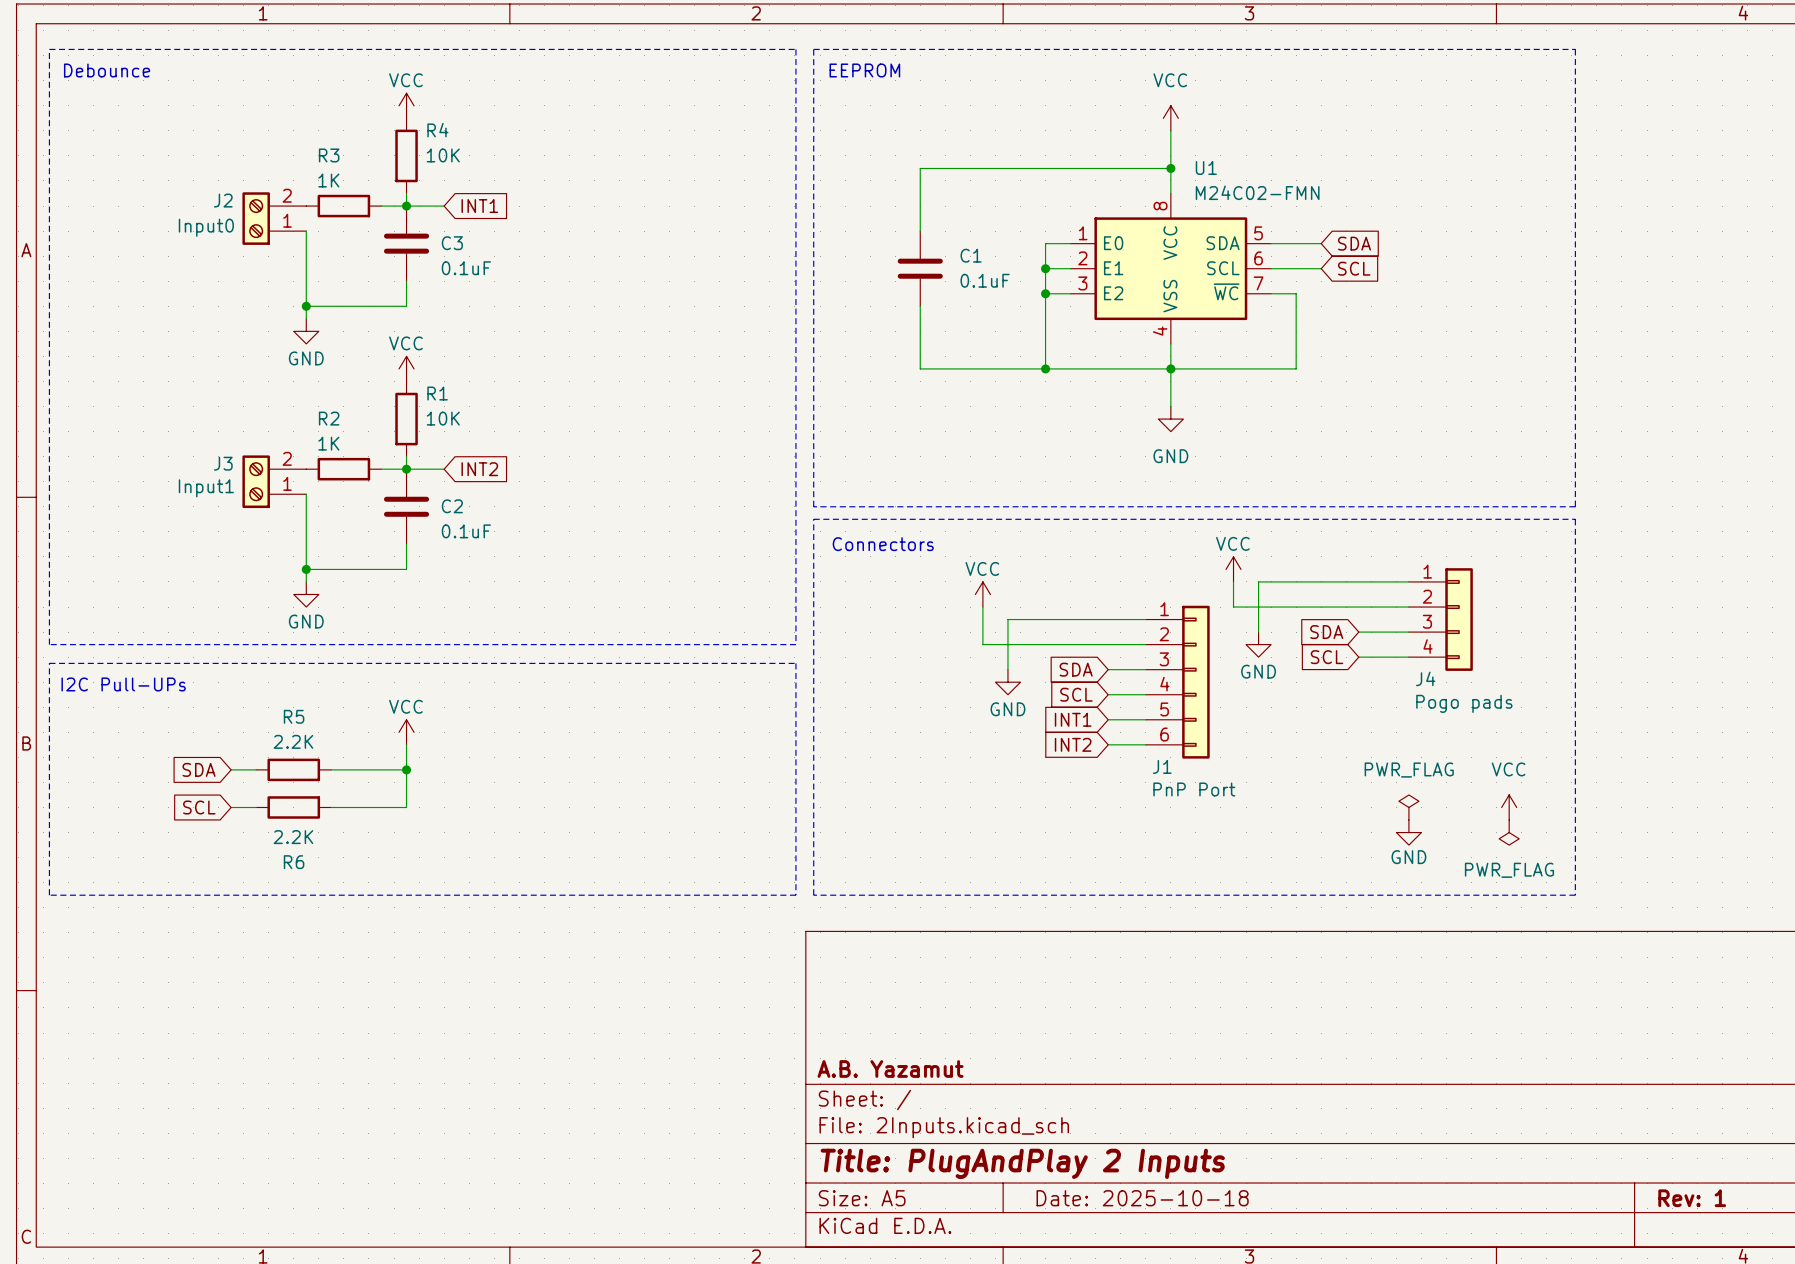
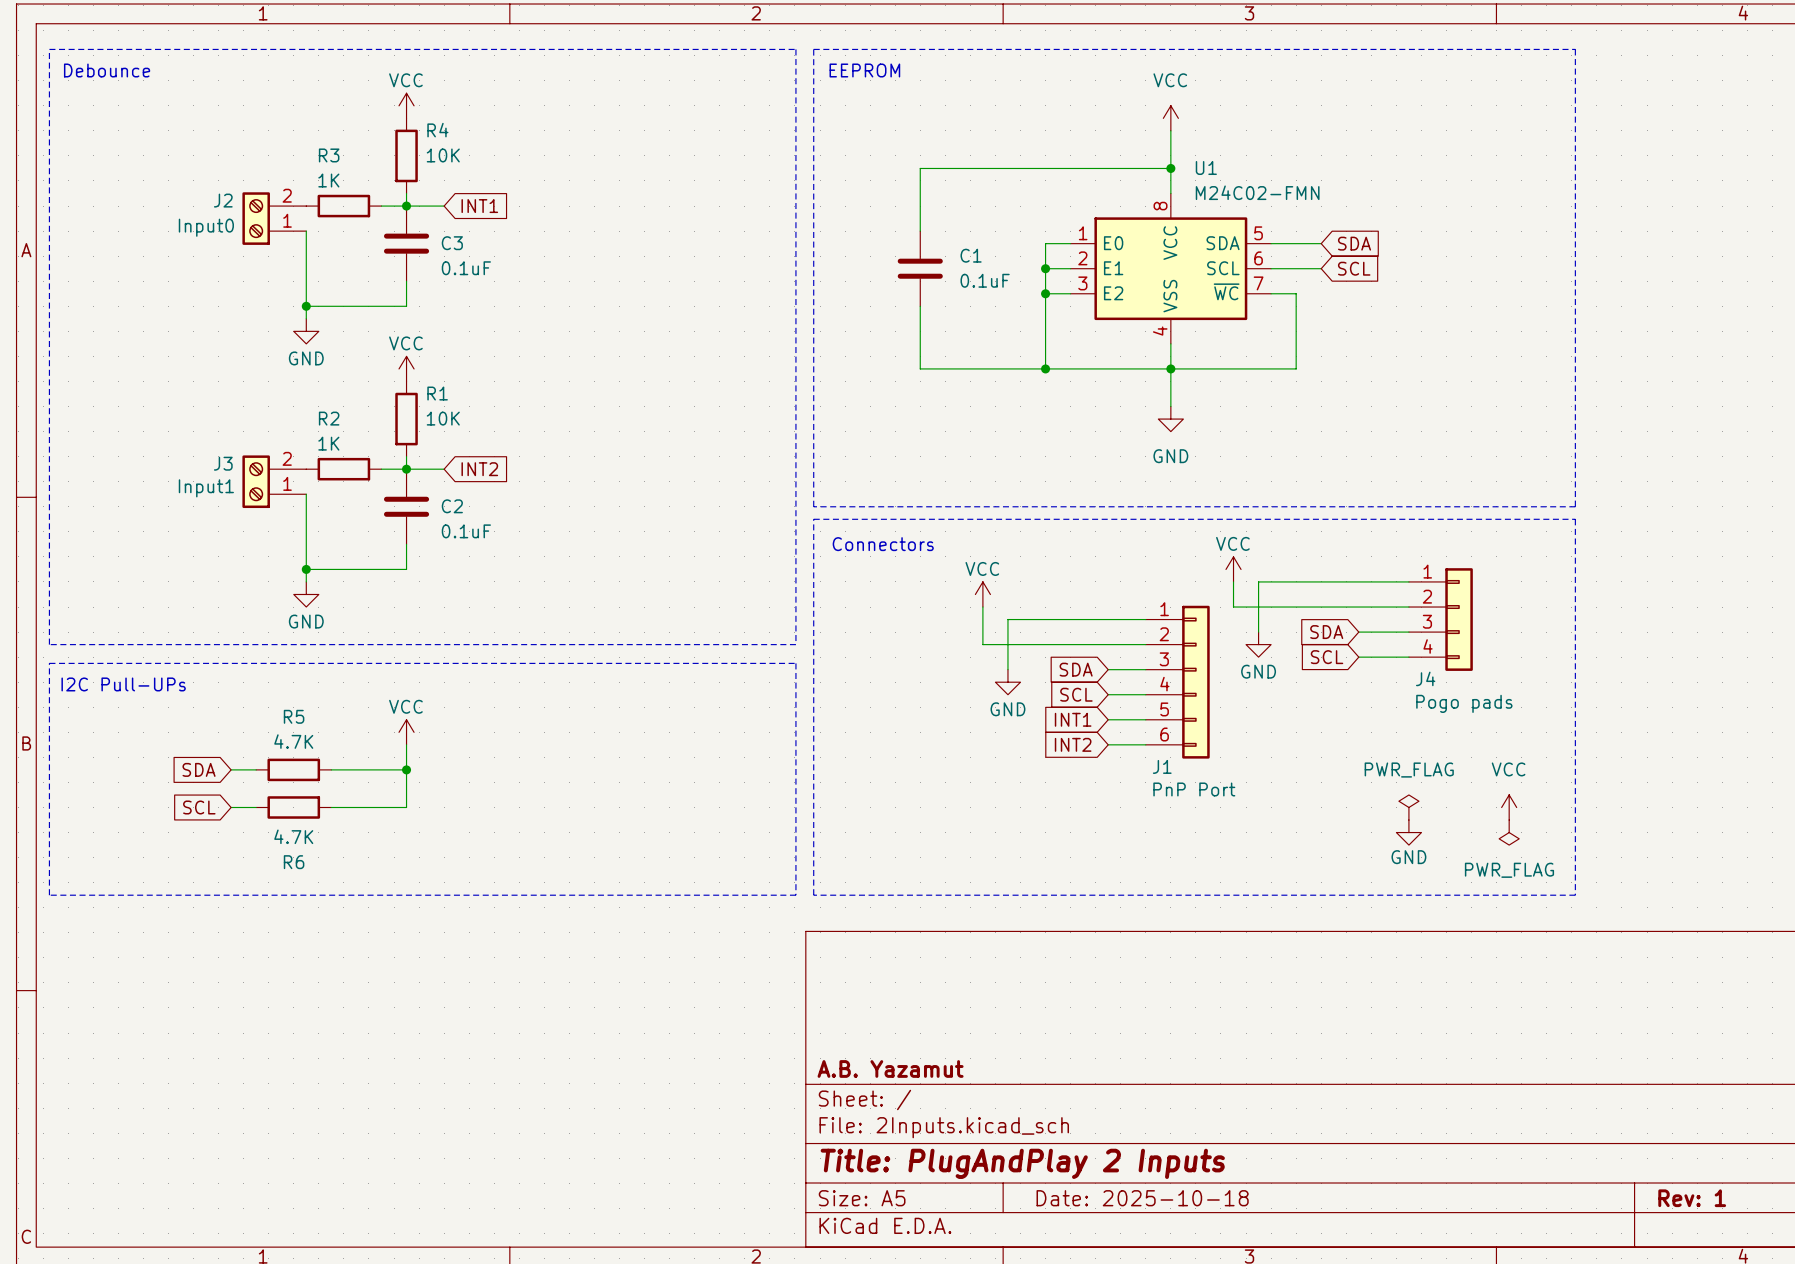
R5 value: 2.2K (293, 741) -> 4.7K (293, 741)
R6 value: 2.2K (293, 837) -> 4.7K (293, 836)

